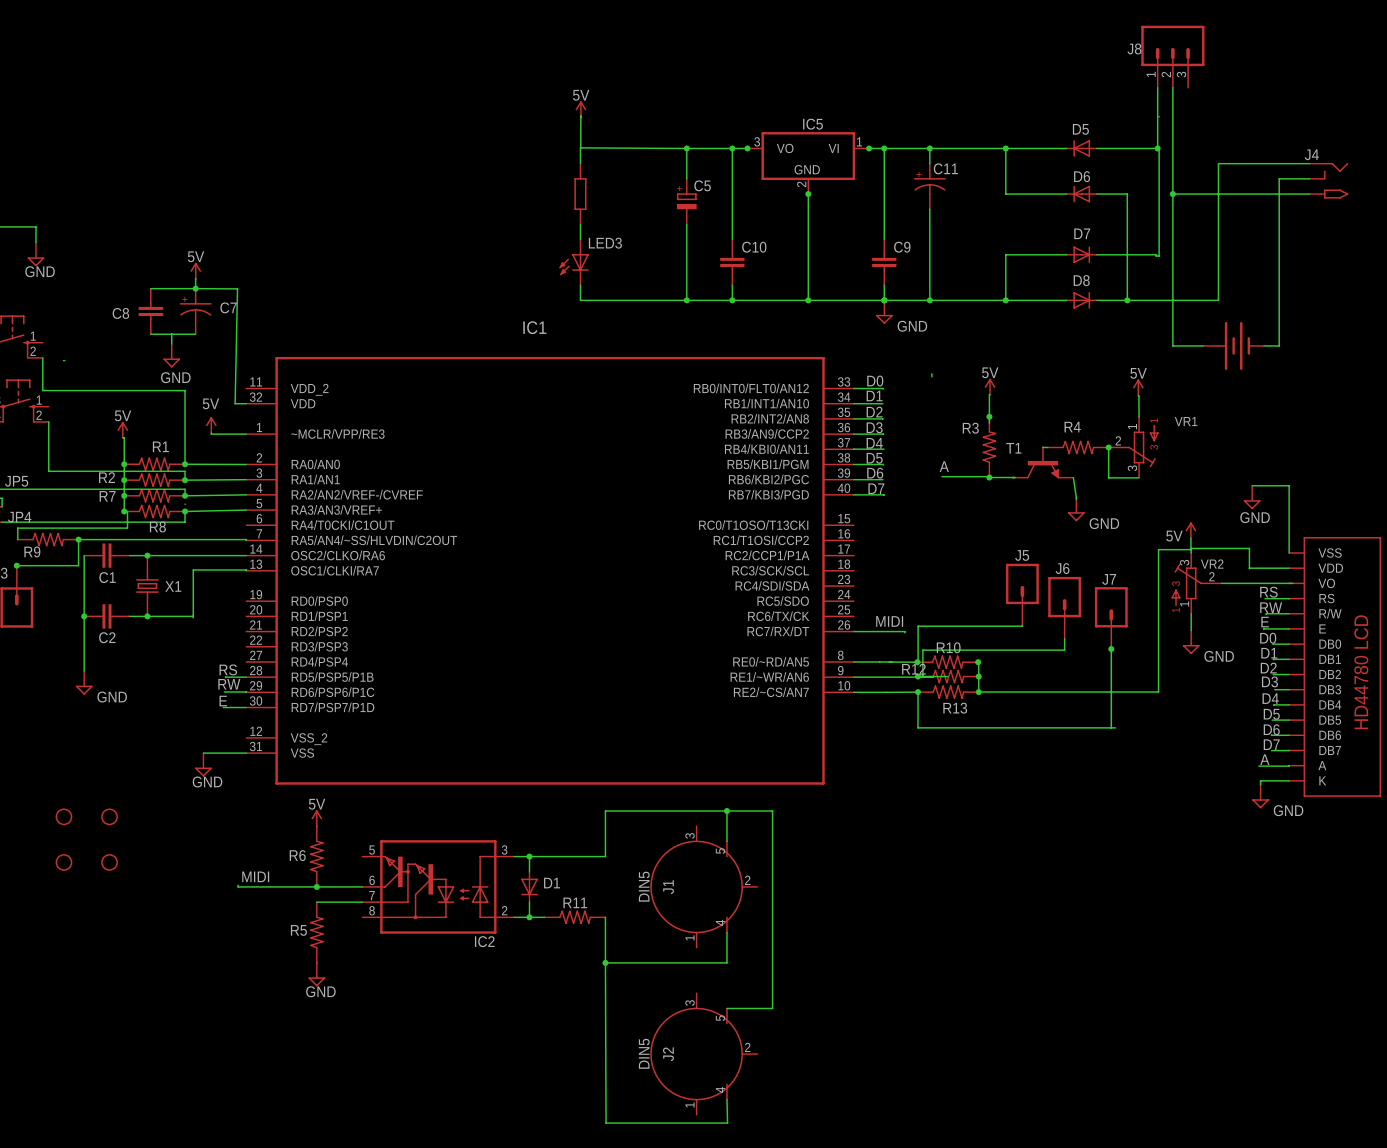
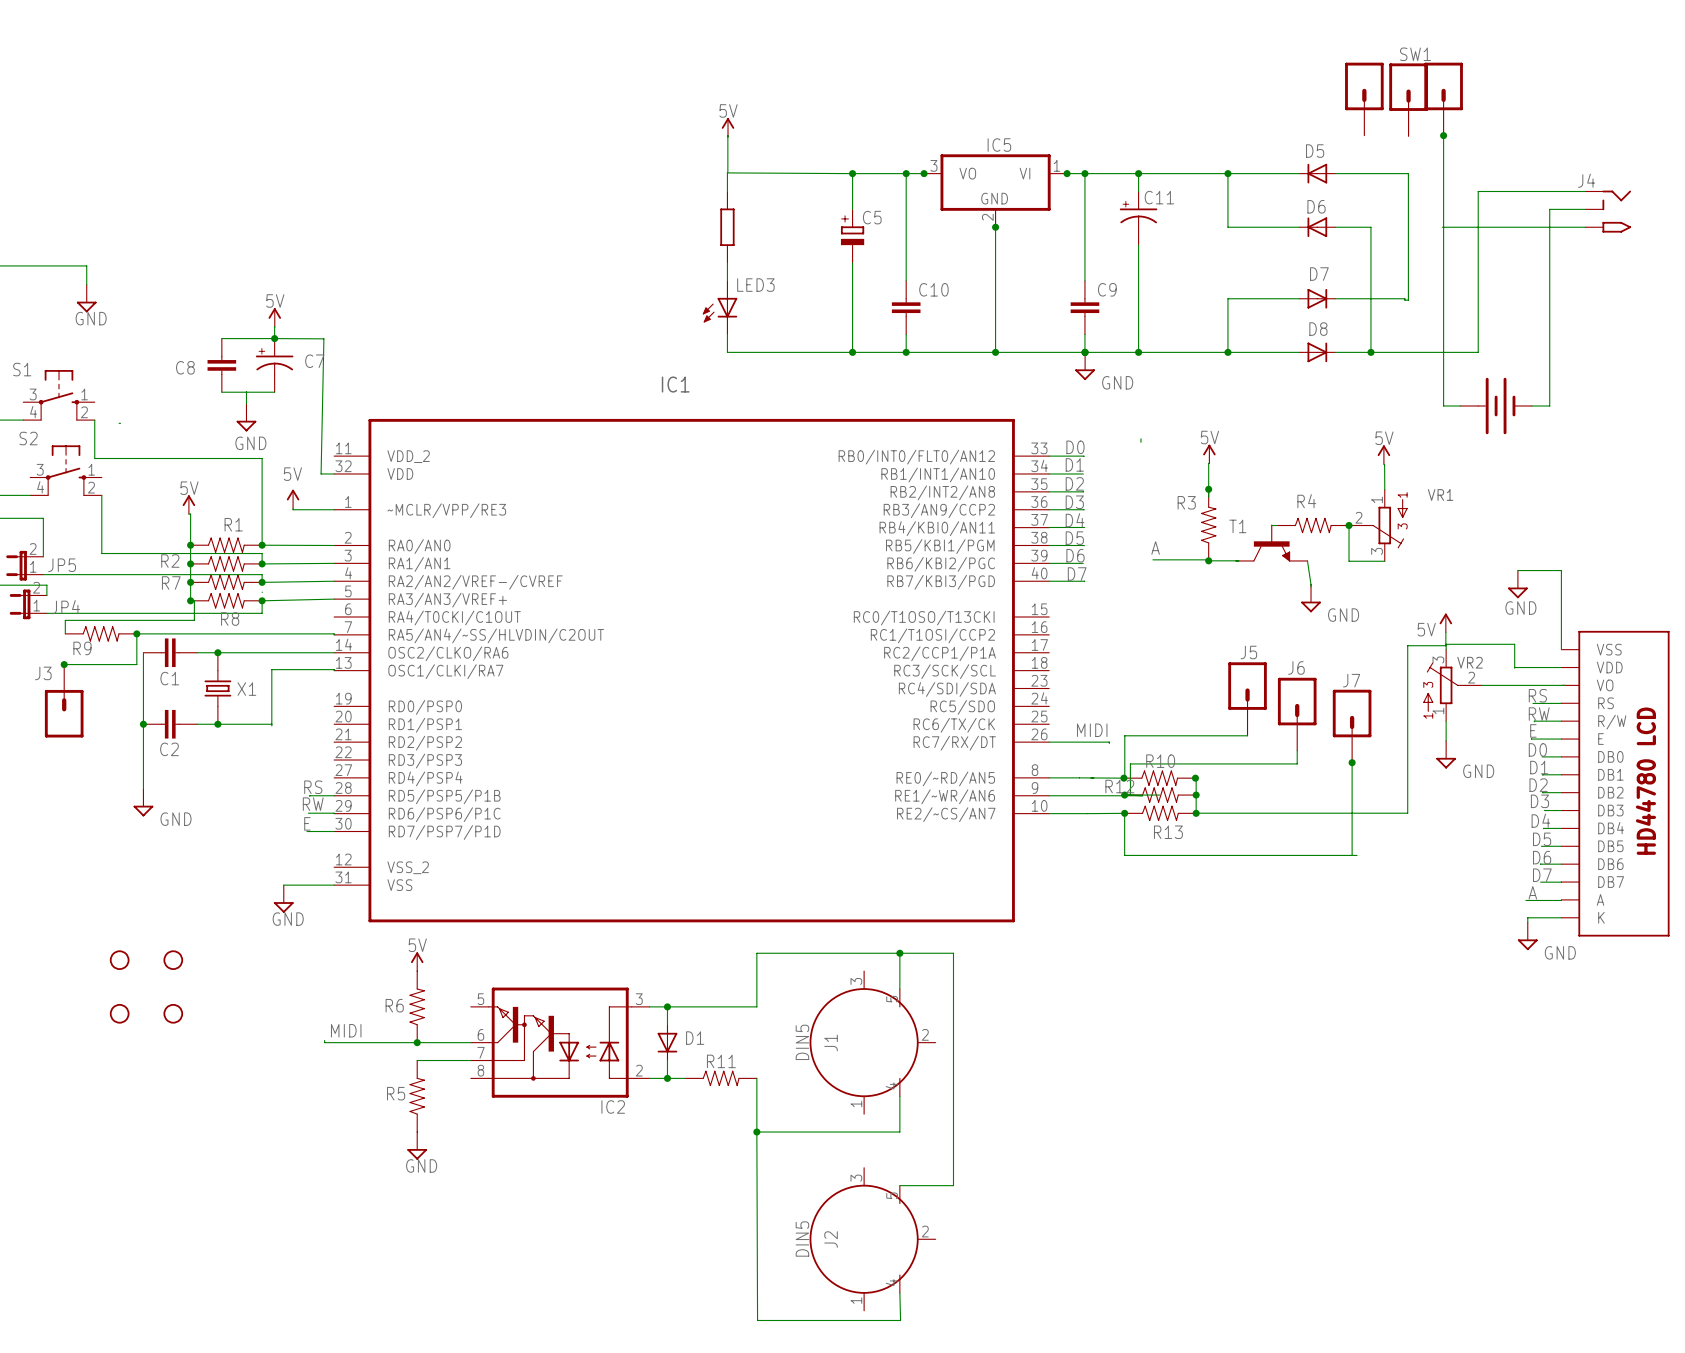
J8: (1172, 56) -> none
part: none -> (1364, 99)
SW1: none -> (1408, 99)
part: none -> (1443, 99)
wire: (1157, 87) (1157, 148) -> none
wire: (1172, 87) (1172, 345) (1189, 345) -> (1443, 132) (1443, 406)
junction: none -> (1443, 135)
junction: (1157, 148) -> none
wire: (1172, 194) (1188, 194) -> none
junction: (1172, 194) -> none

